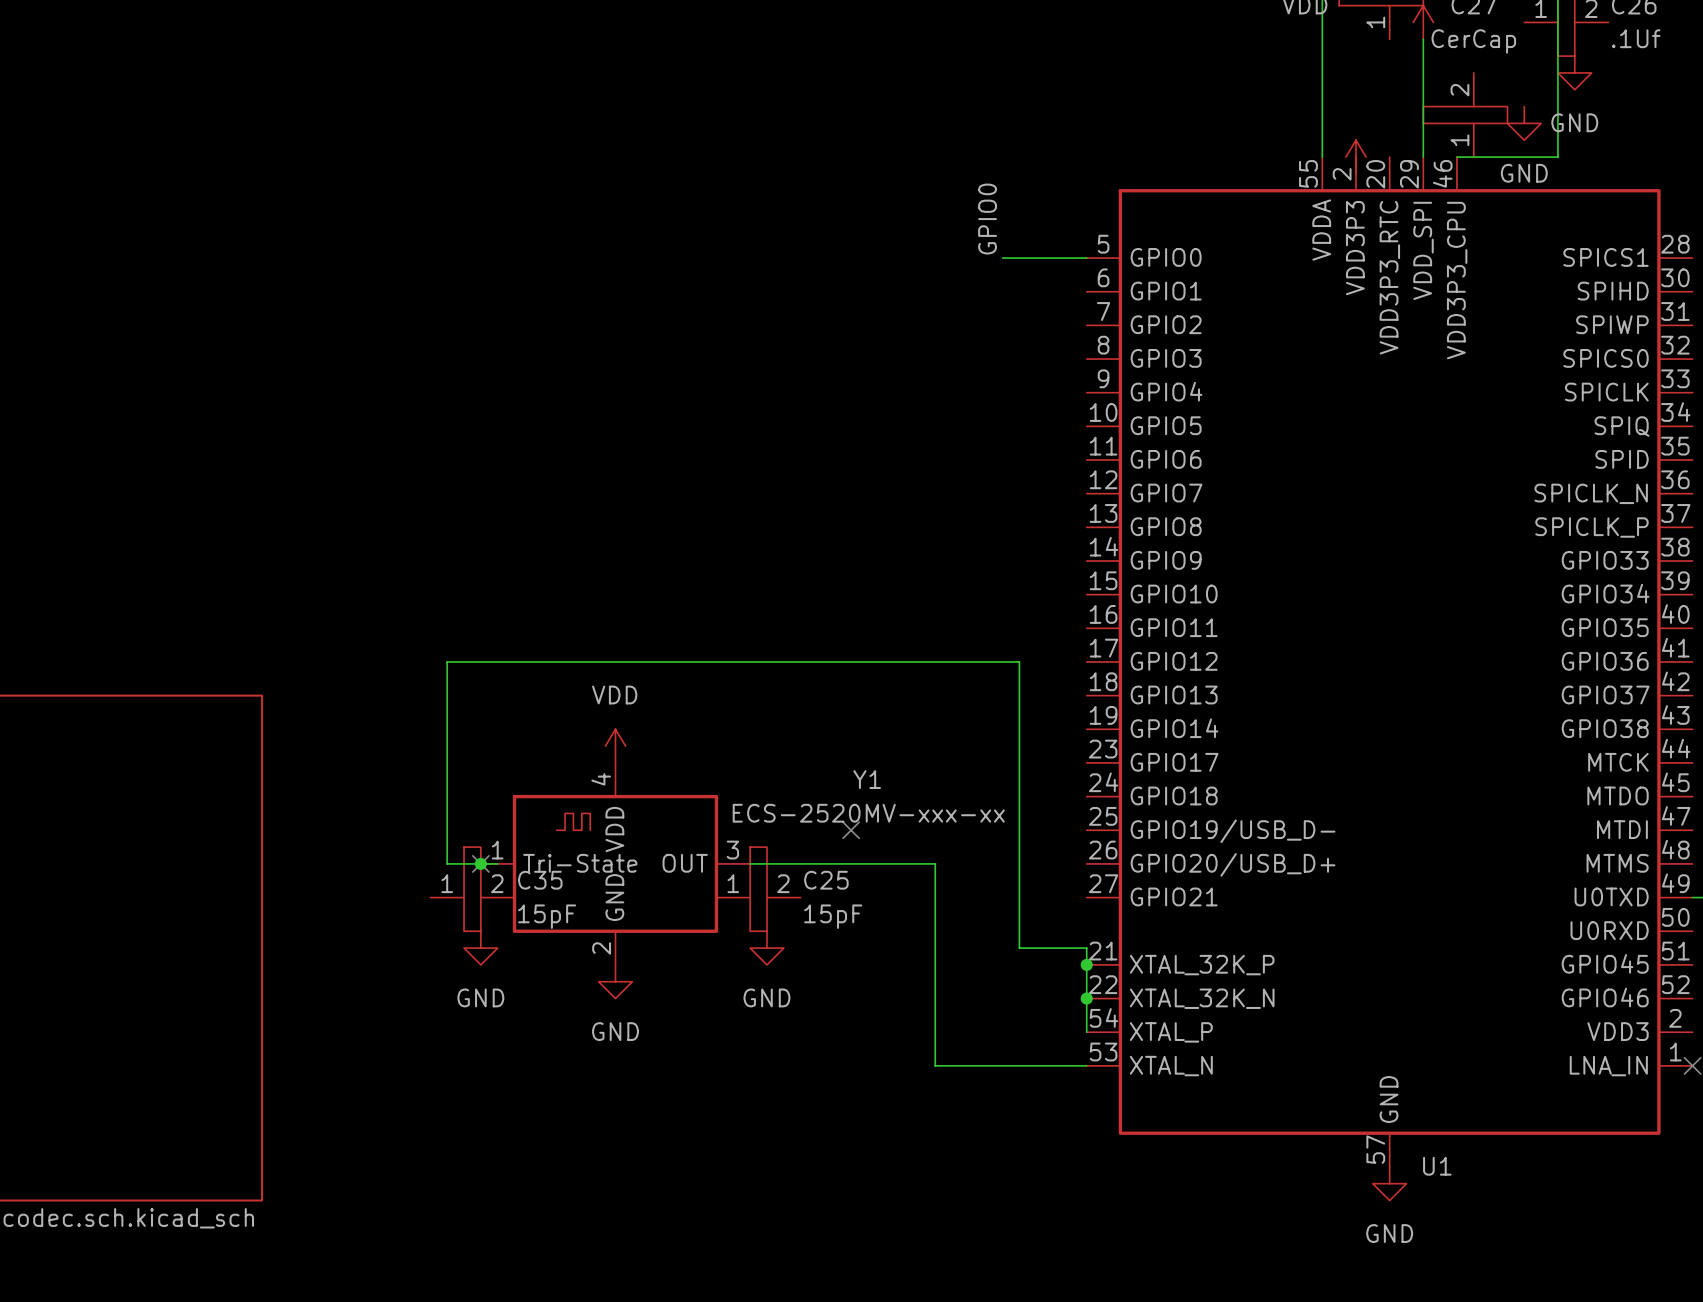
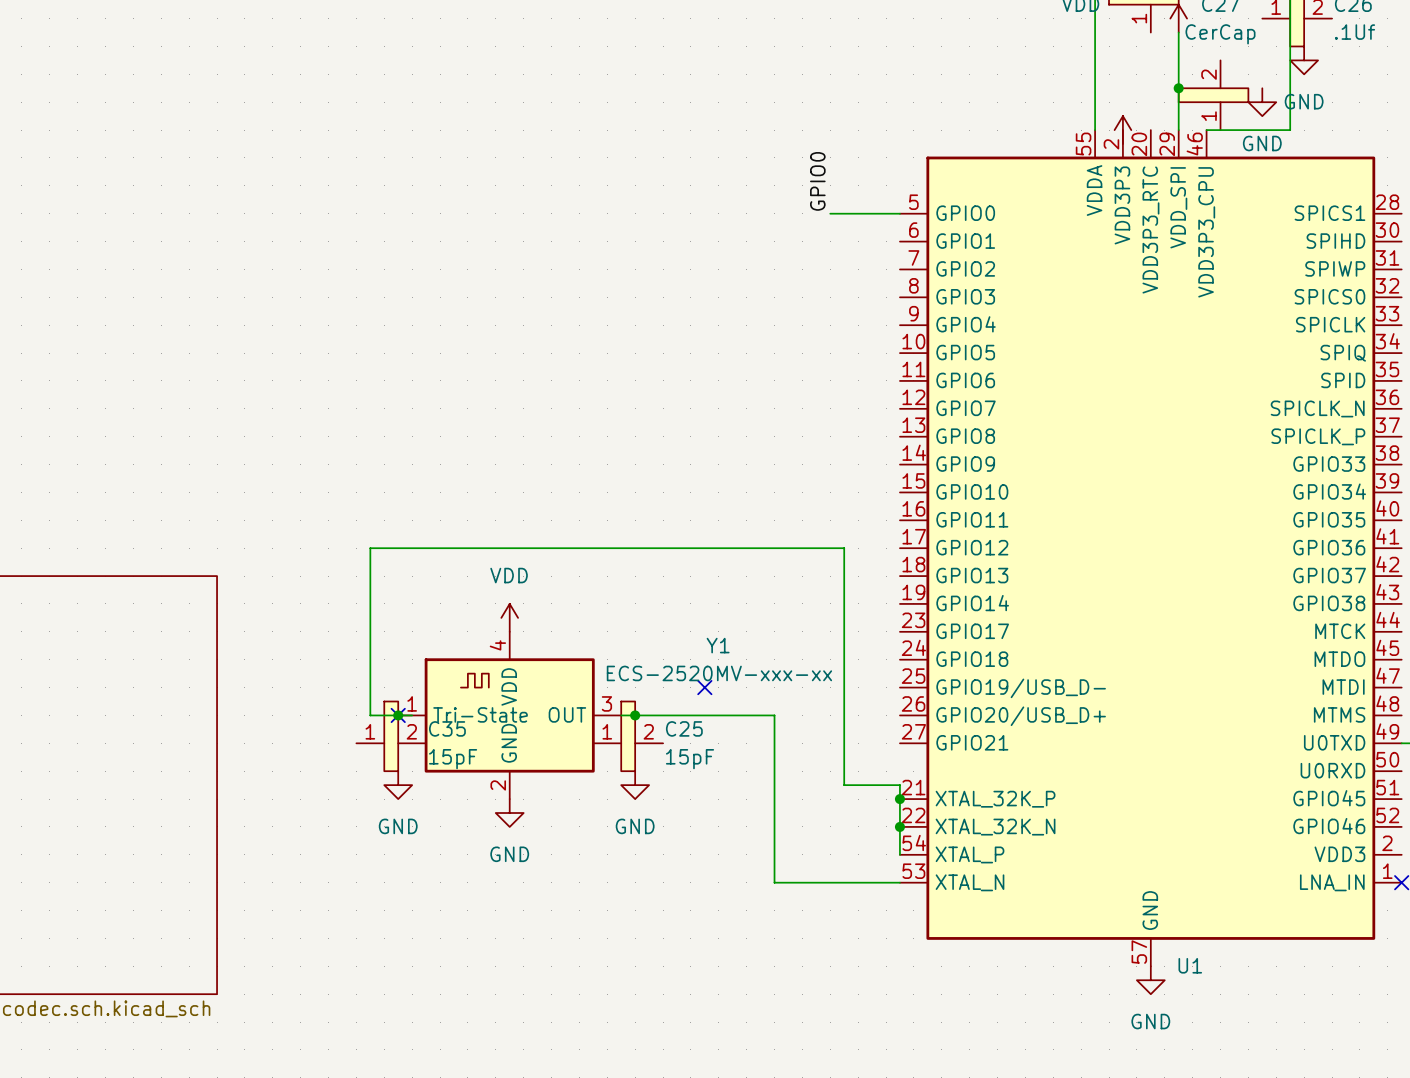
junction: none -> (1178, 88)
junction: none -> (635, 715)

